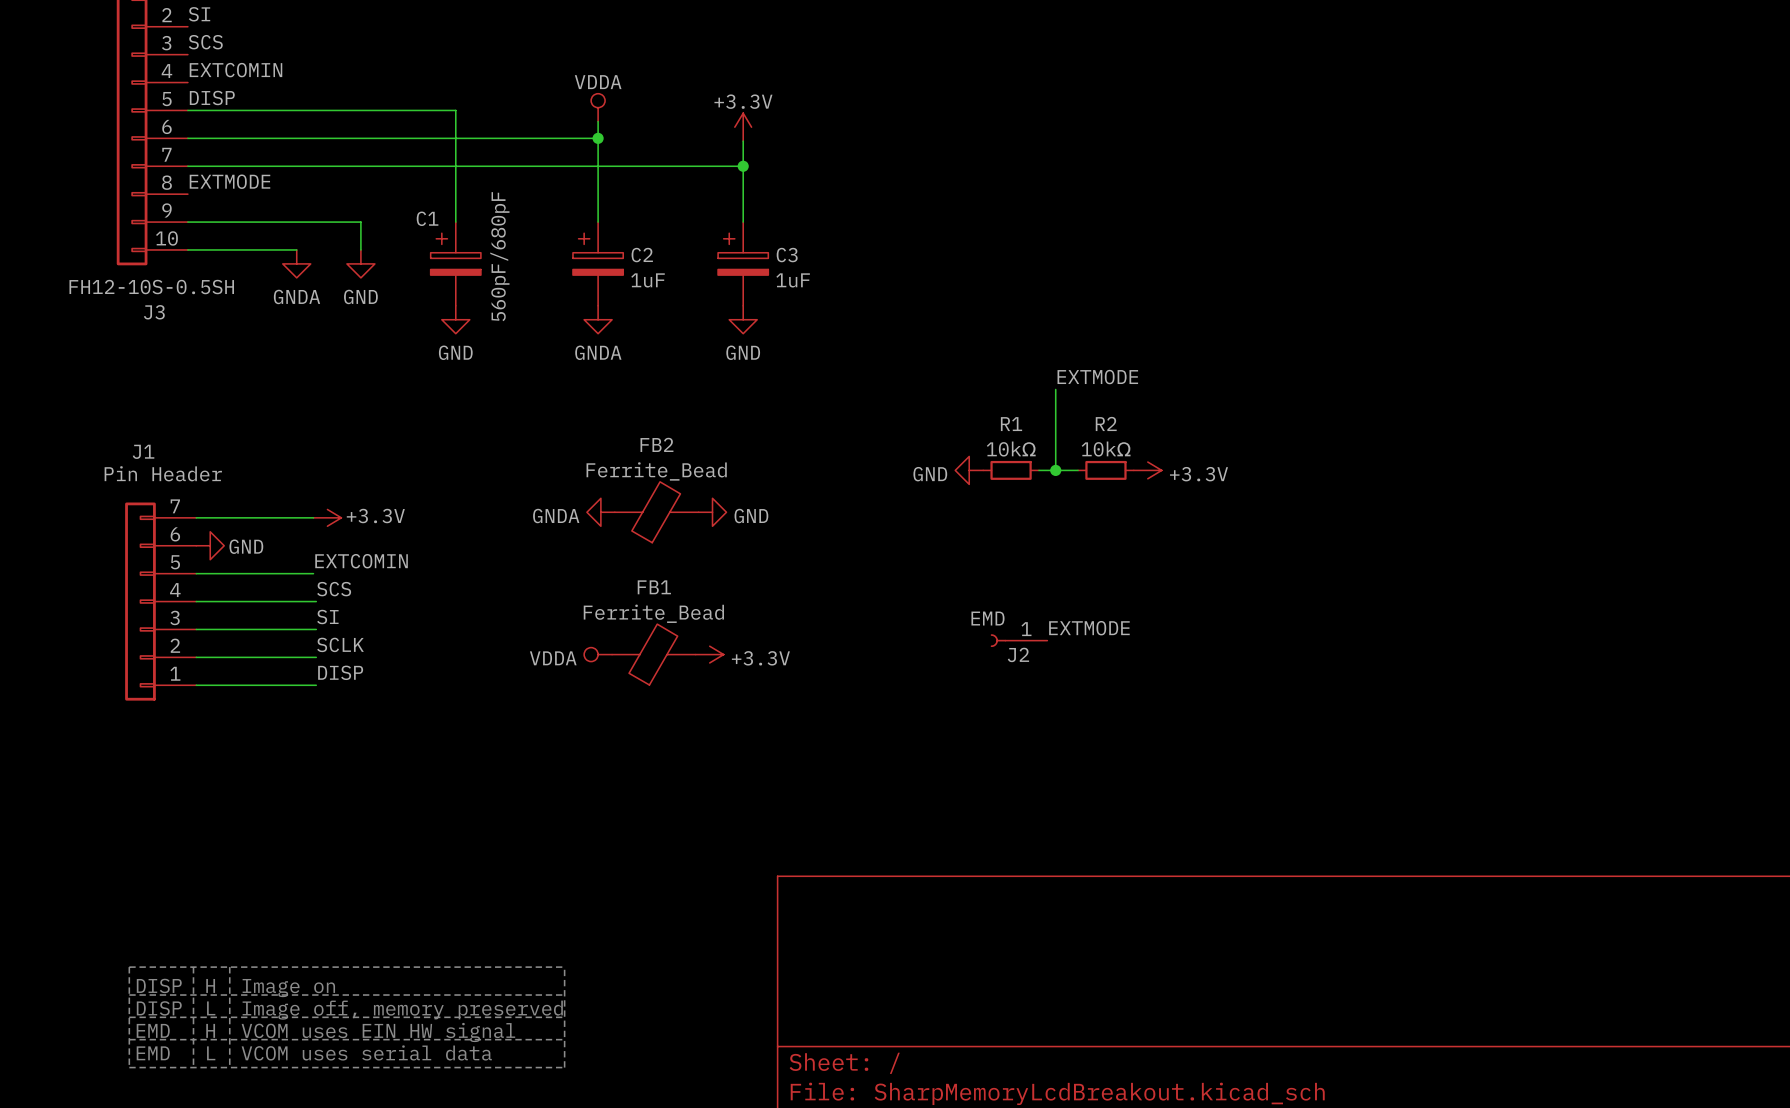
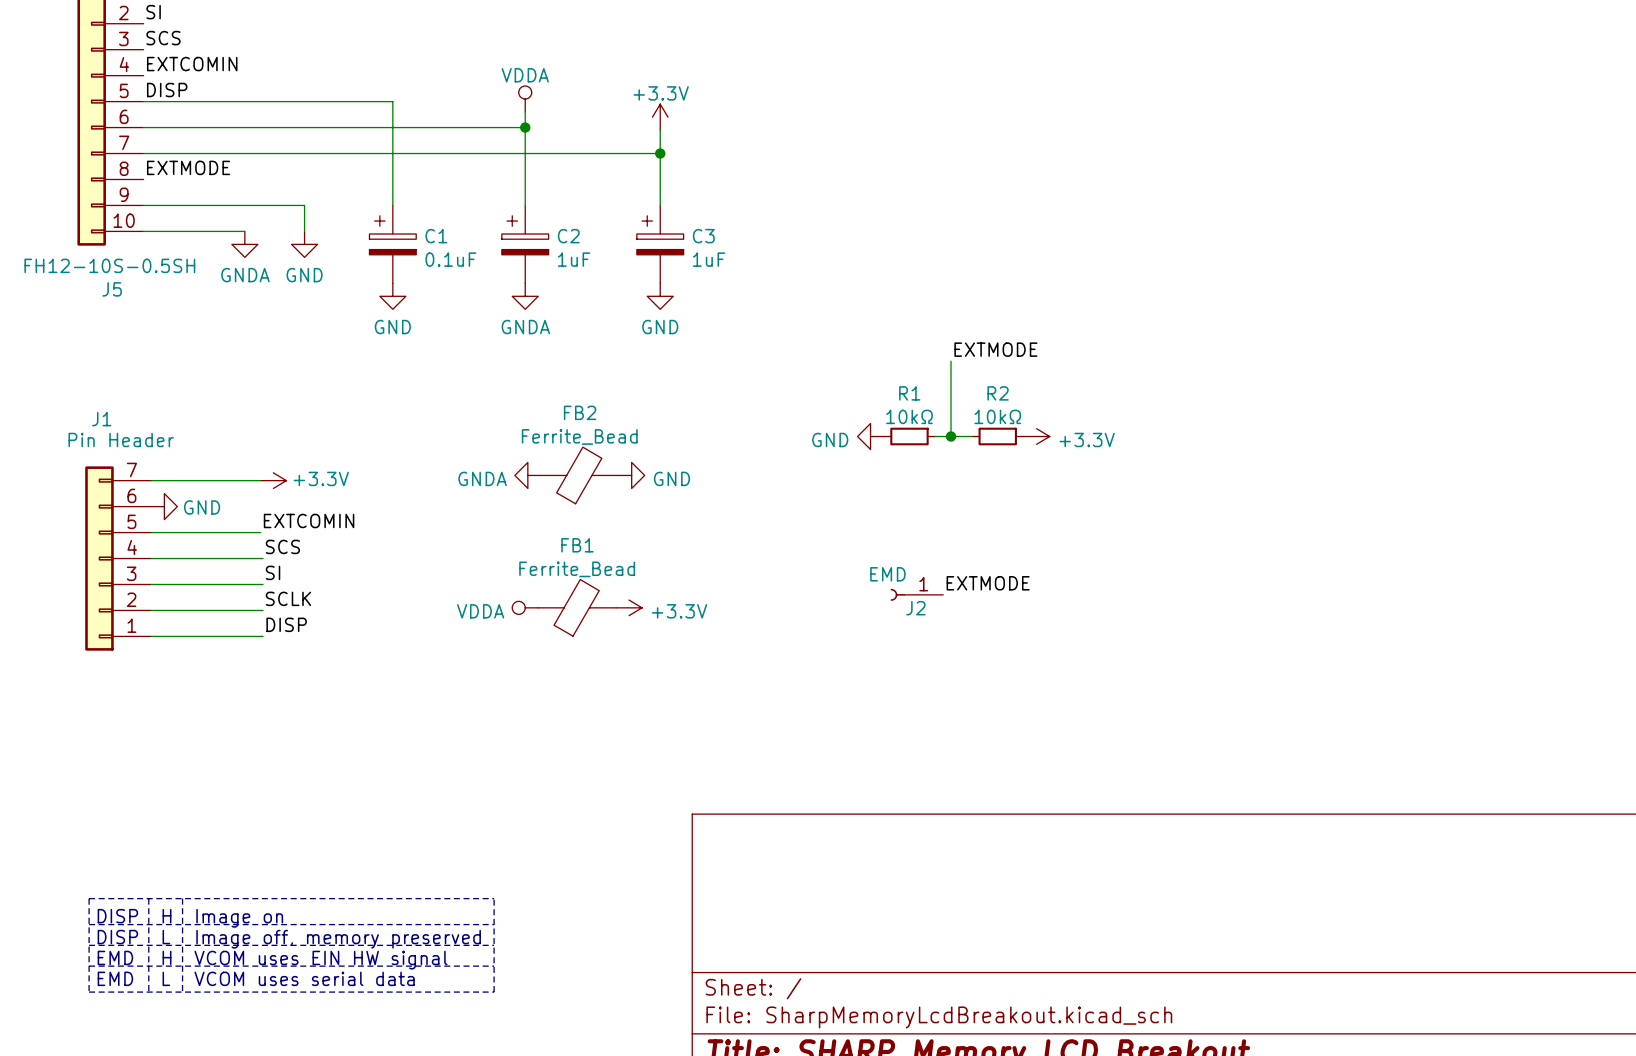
C1 name position: C1 (427, 218) -> C1 (436, 236)
C1 value: 560pF/680pF (499, 256) -> 0.1uF (450, 259)
J3 name: J3 (154, 312) -> J5 (112, 289)

